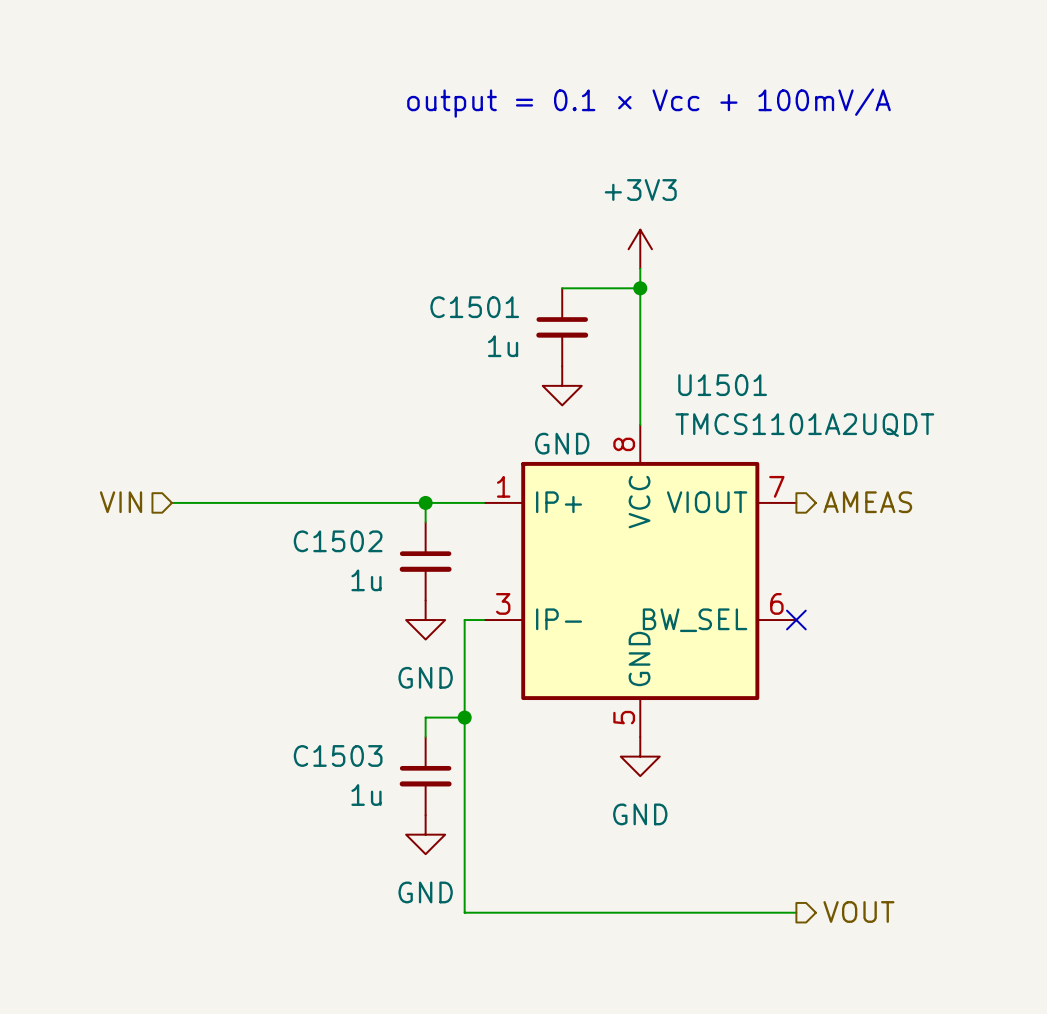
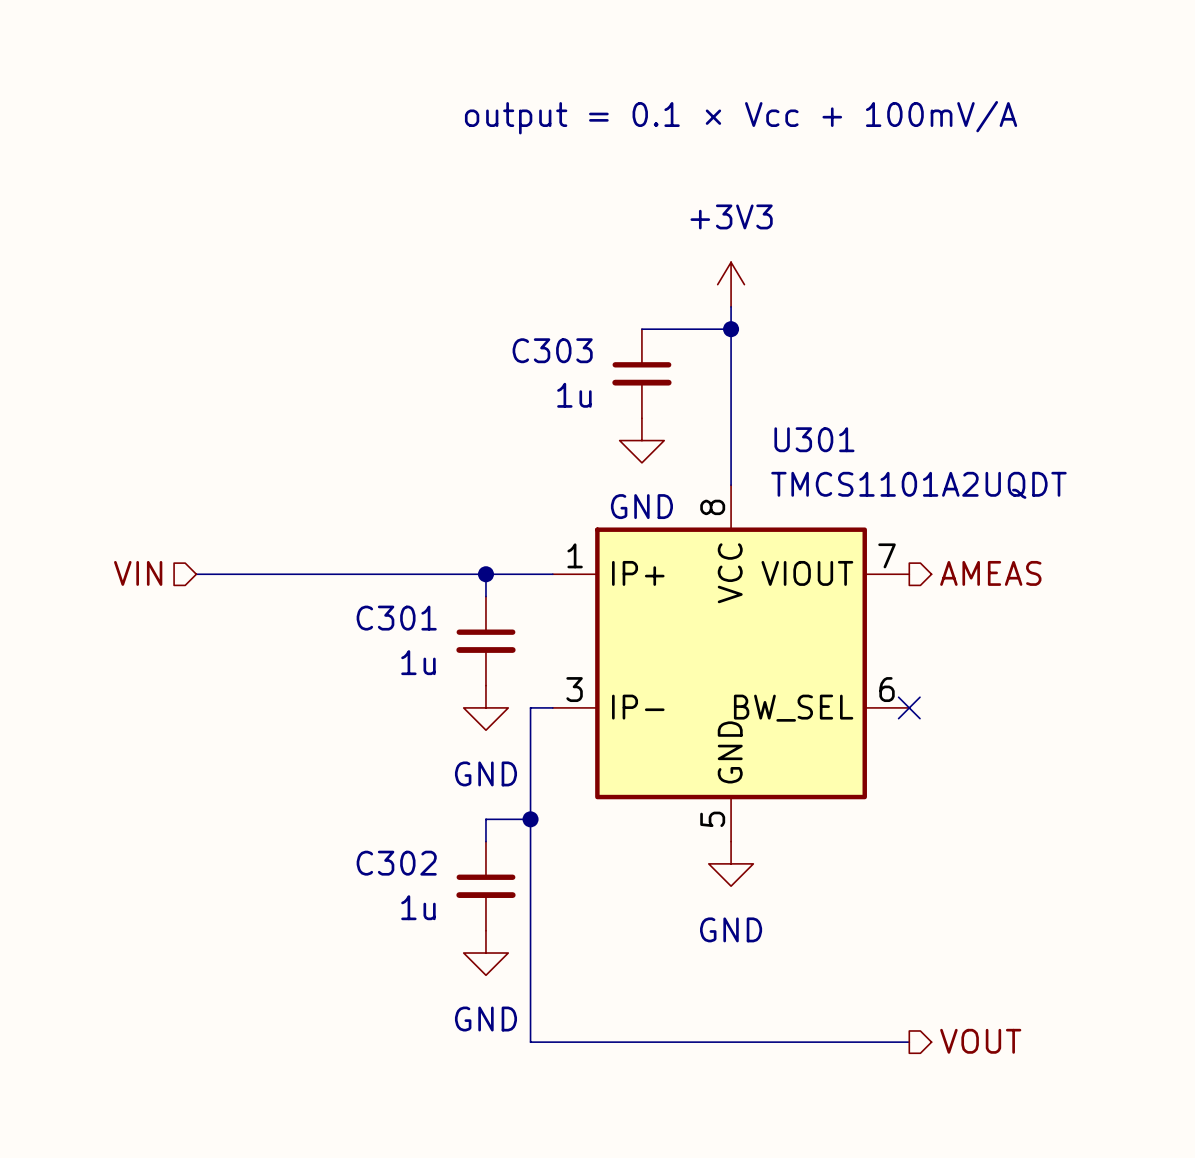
C1501 name: C1501 (474, 307) -> C303 (552, 350)
U1501 name: U1501 (722, 385) -> U301 (814, 439)
C1502 name: C1502 (338, 541) -> C301 (396, 618)
C1503 name: C1503 (338, 755) -> C302 (396, 863)

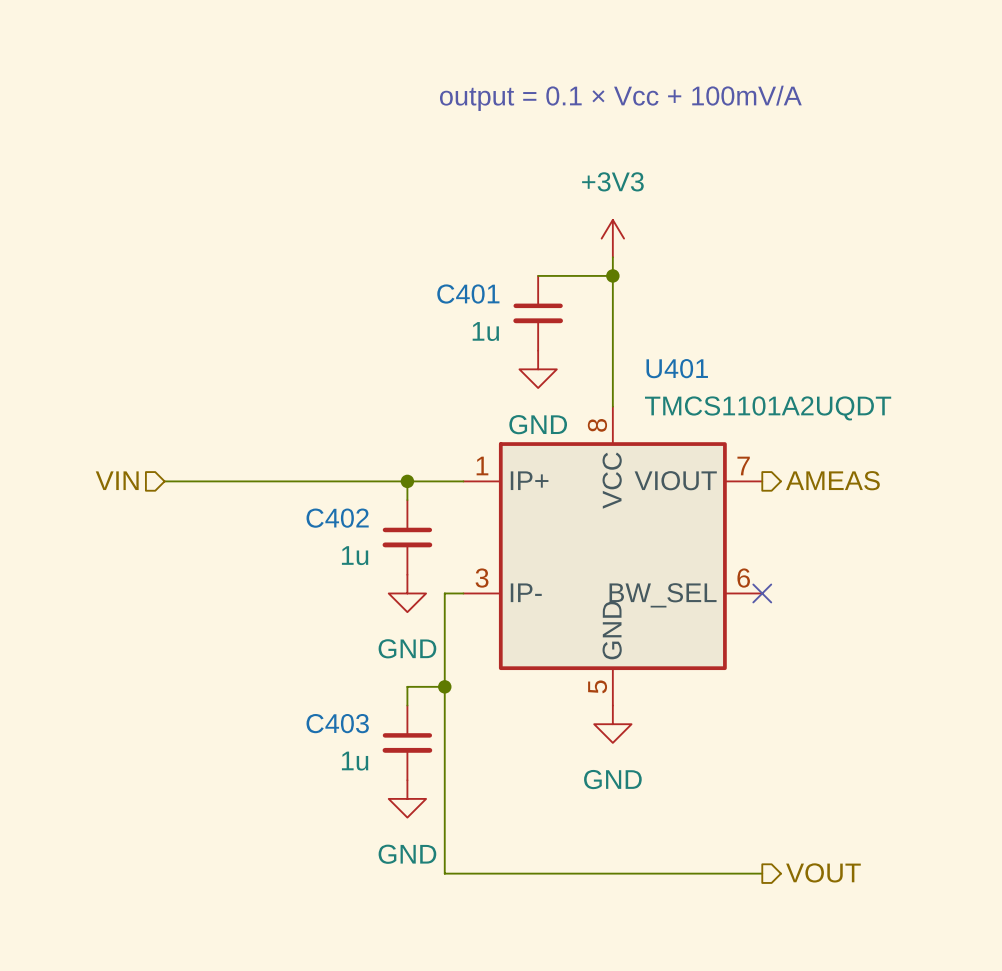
C303 name: C303 (552, 350) -> C401 (468, 294)
U301 name: U301 (814, 439) -> U401 (677, 368)
C301 name: C301 (396, 618) -> C402 (337, 518)
C302 name: C302 (396, 863) -> C403 (337, 723)

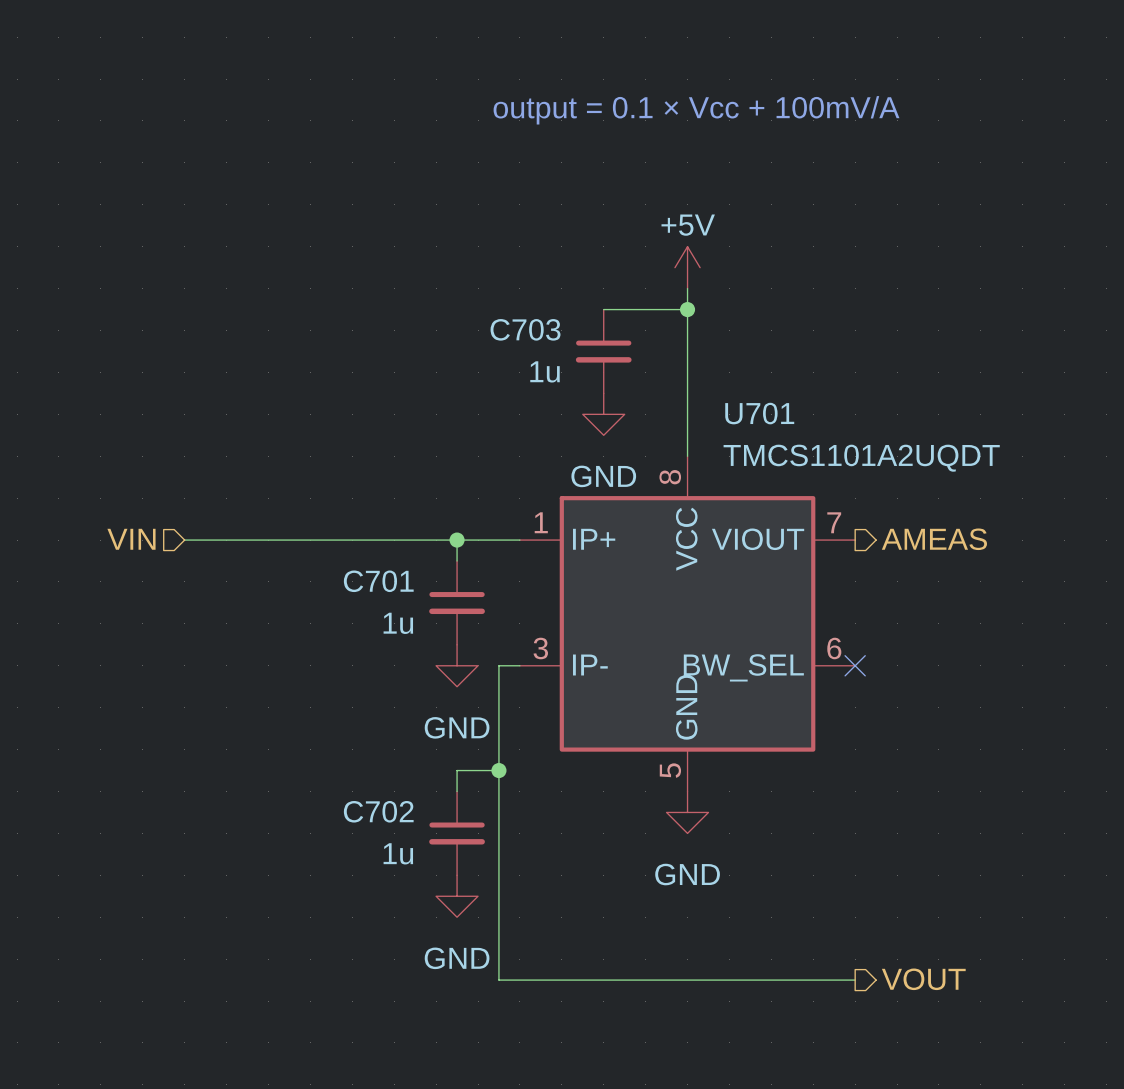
power symbol: +3V3 (612, 238) -> +5V (687, 267)
C401 name: C401 (468, 294) -> C703 (525, 329)
U401 name: U401 (677, 368) -> U701 (759, 413)
C402 name: C402 (337, 518) -> C701 (378, 581)
C403 name: C403 (337, 723) -> C702 (378, 811)

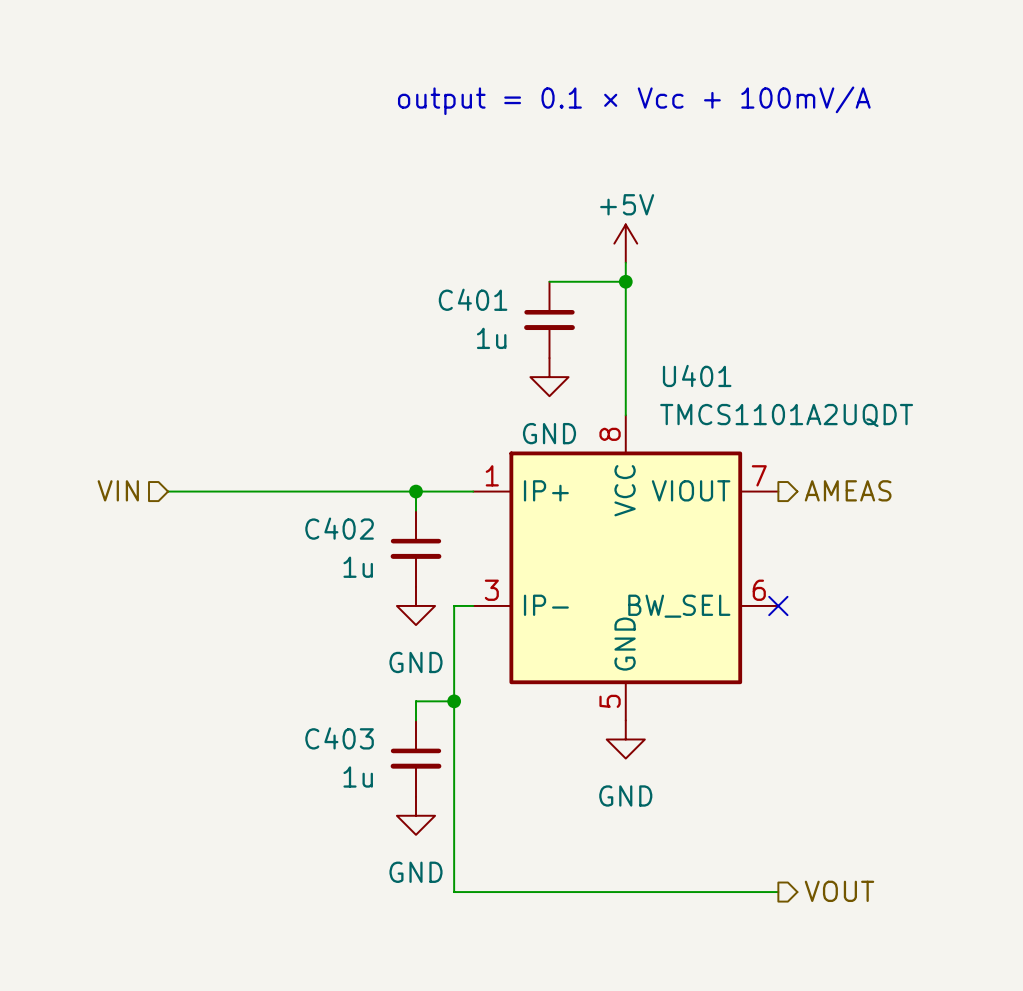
C703 name: C703 (525, 329) -> C401 (473, 299)
U701 name: U701 (759, 413) -> U401 (697, 375)
C701 name: C701 (378, 581) -> C402 (339, 528)
C702 name: C702 (378, 811) -> C403 (339, 738)

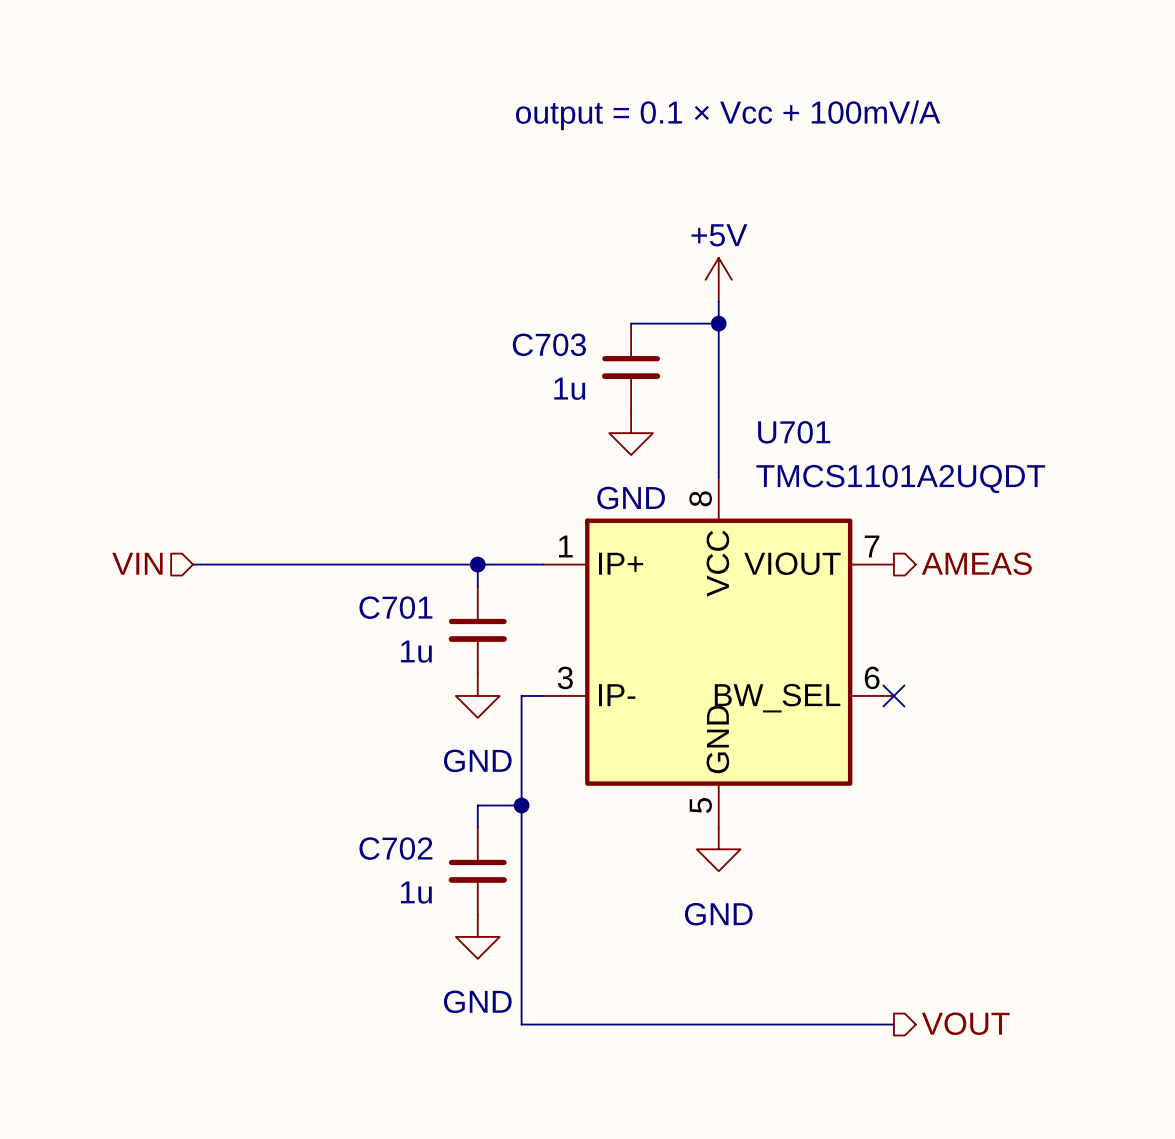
C401 name: C401 (473, 299) -> C703 (549, 344)
U401 name: U401 (697, 375) -> U701 (794, 432)
C402 name: C402 (339, 528) -> C701 (395, 607)
C403 name: C403 (339, 738) -> C702 (395, 848)

